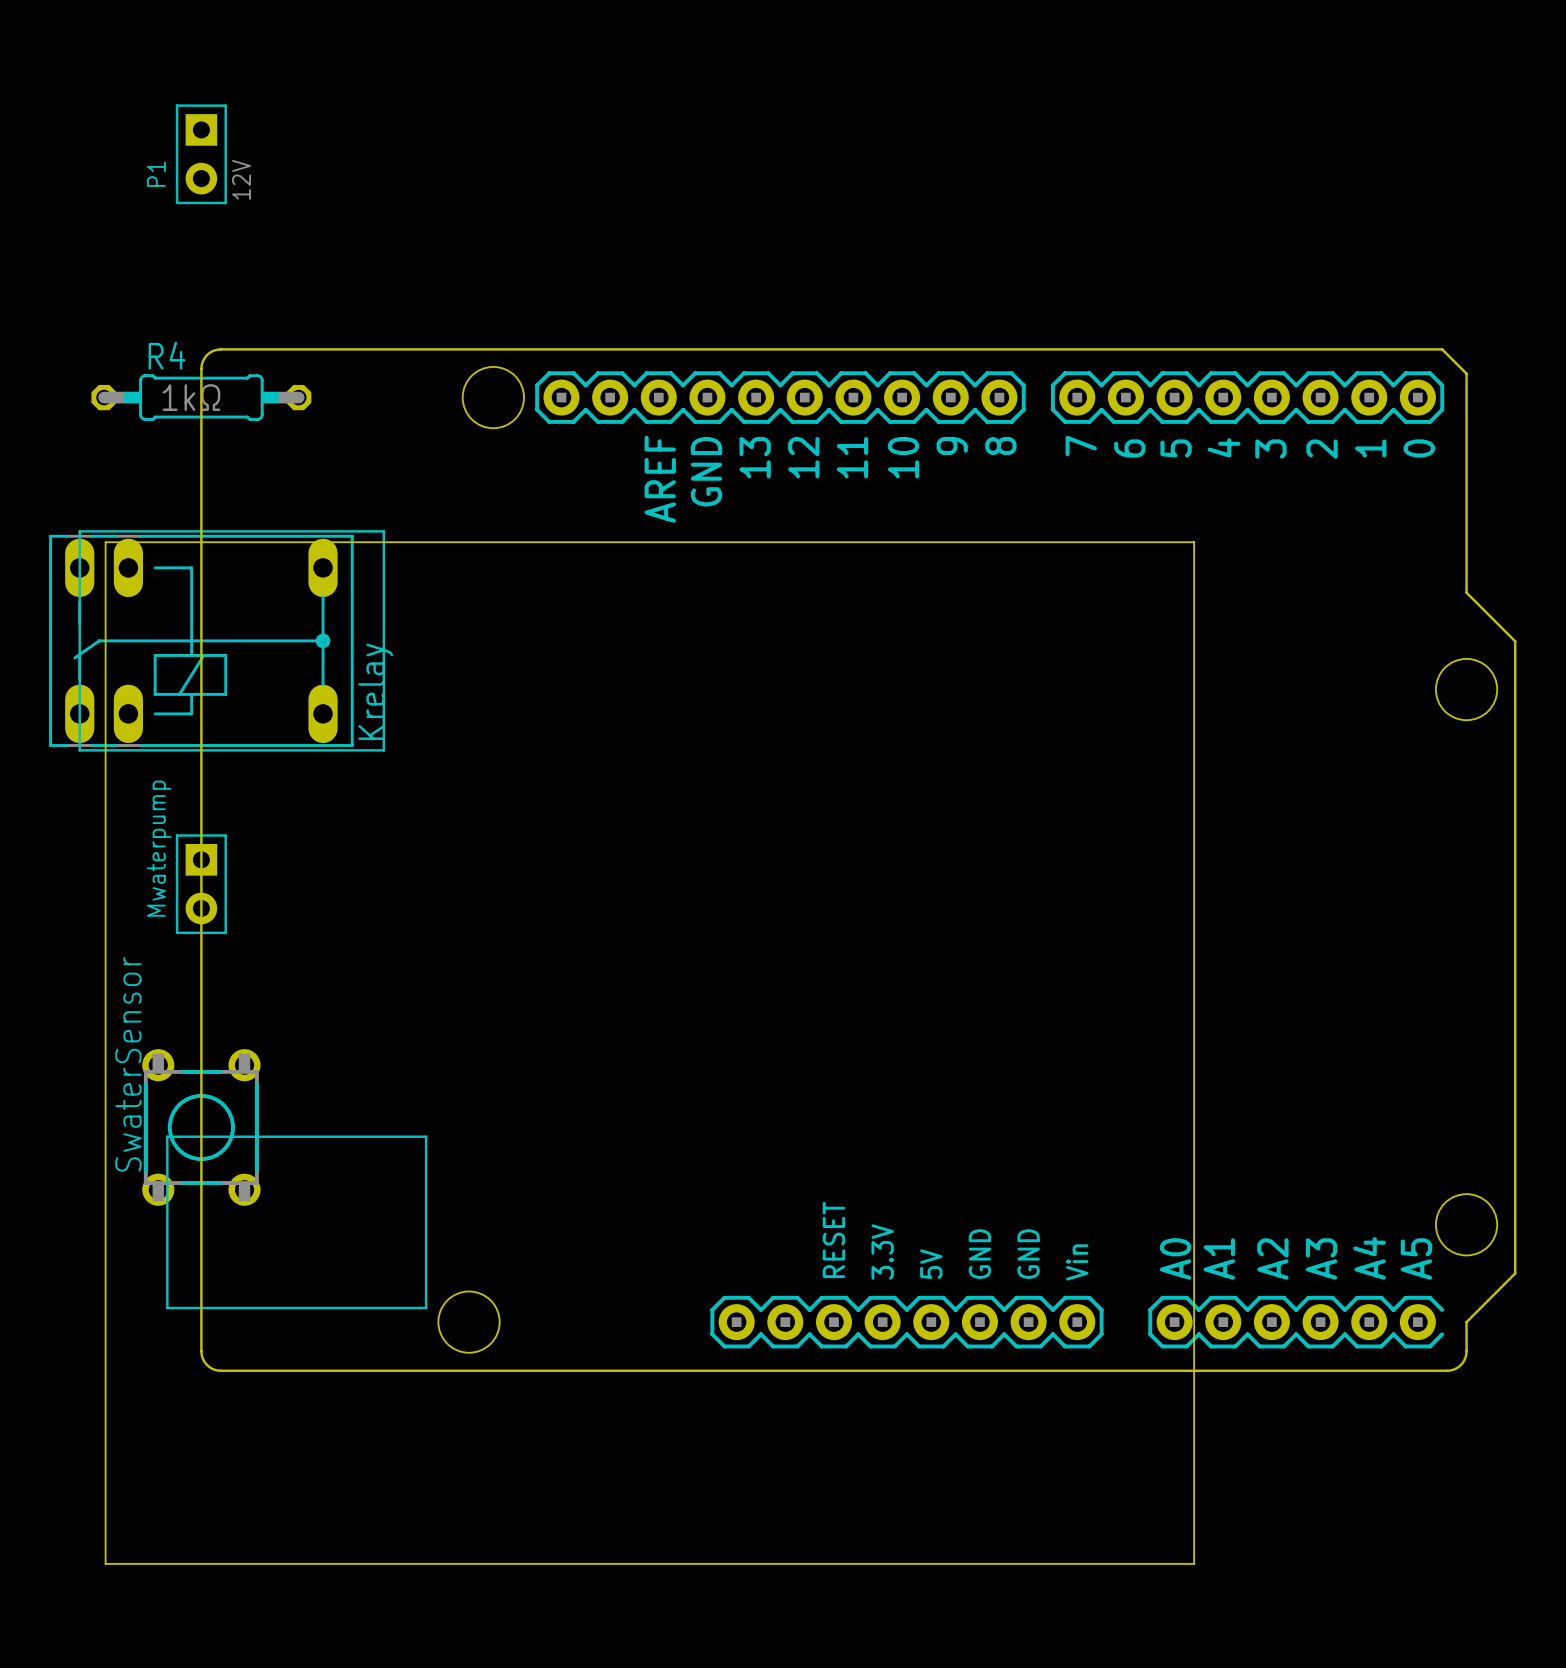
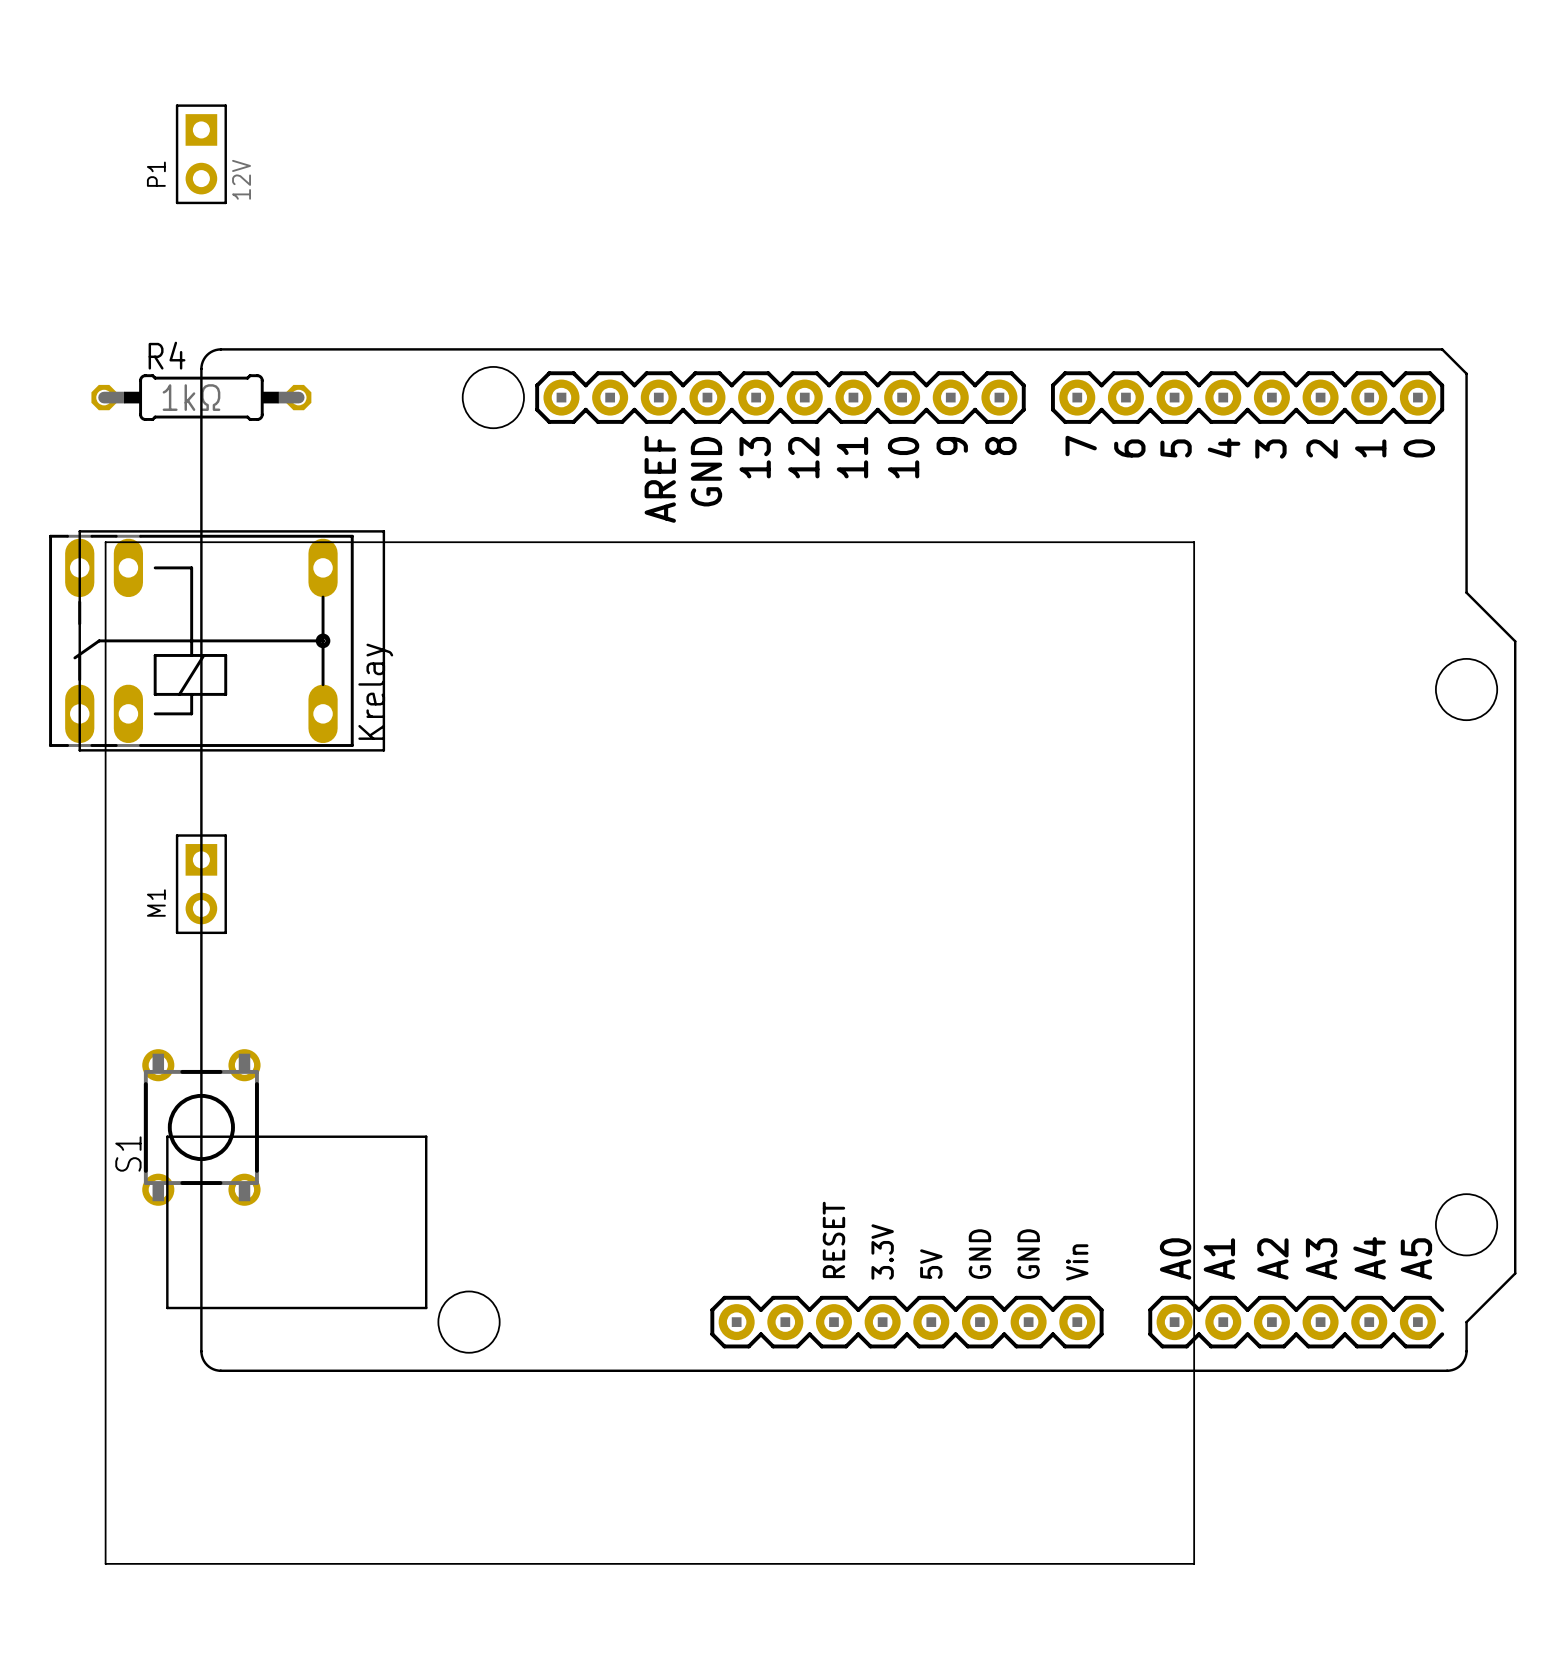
Mwaterpump name: Mwaterpump (159, 848) -> M1 (156, 903)
SwaterSensor name: SwaterSensor (128, 1064) -> S1 (128, 1154)

